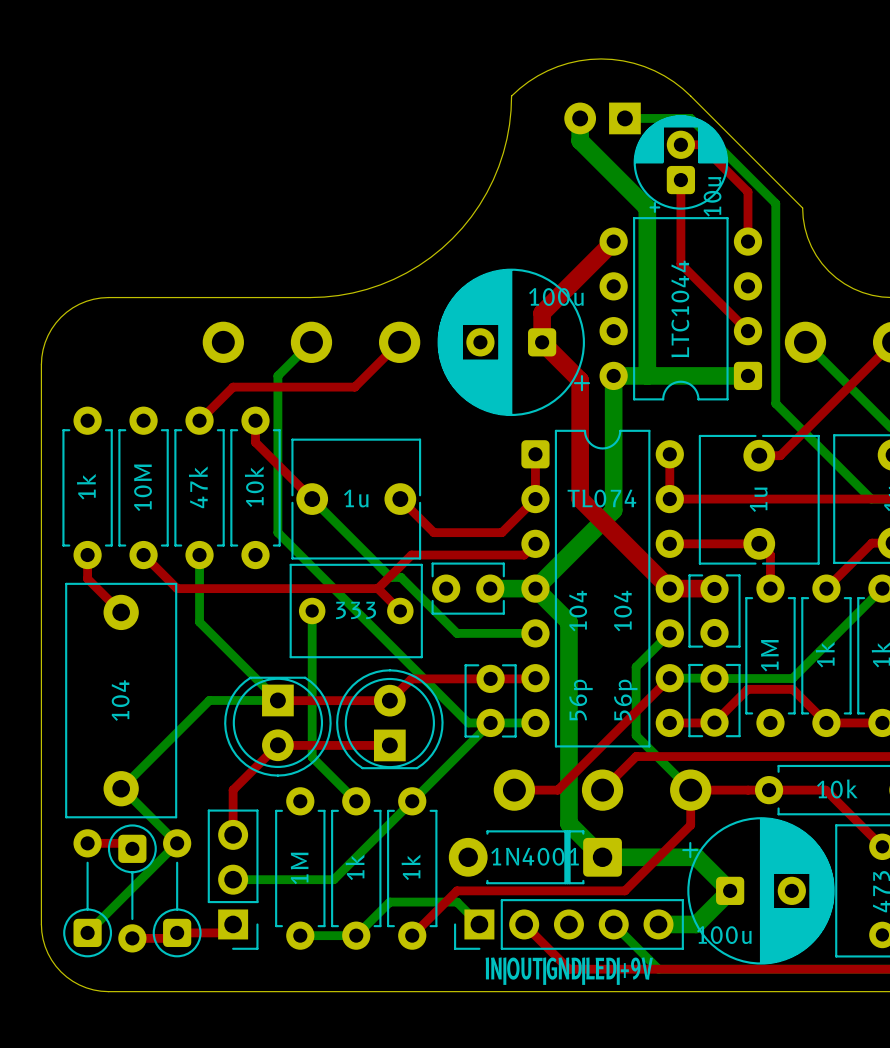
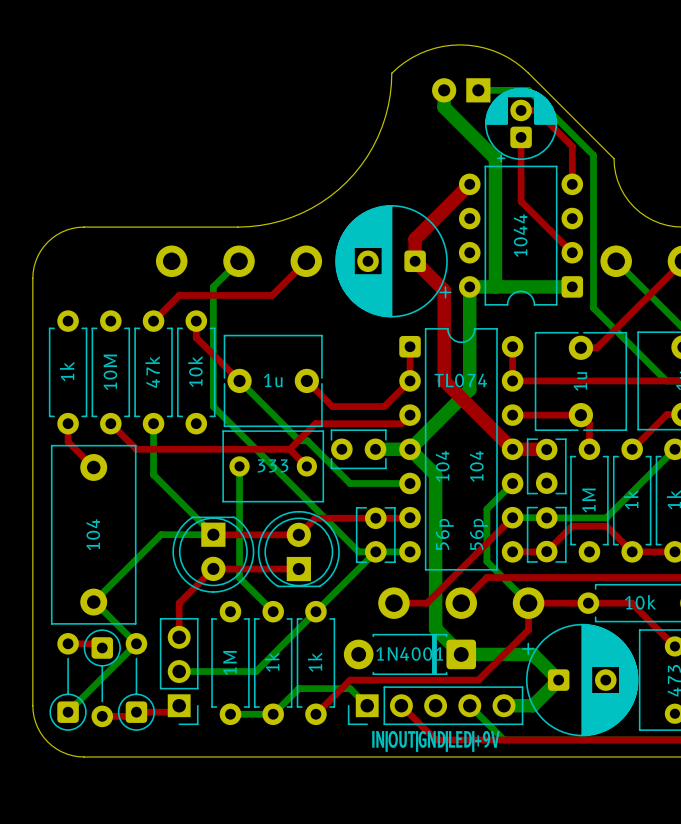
part value: 10u (712, 196) -> none
part value: 100u (556, 296) -> none
part value: LTC1044 (680, 308) -> 1044 (520, 235)
part value: 100u (724, 935) -> none

